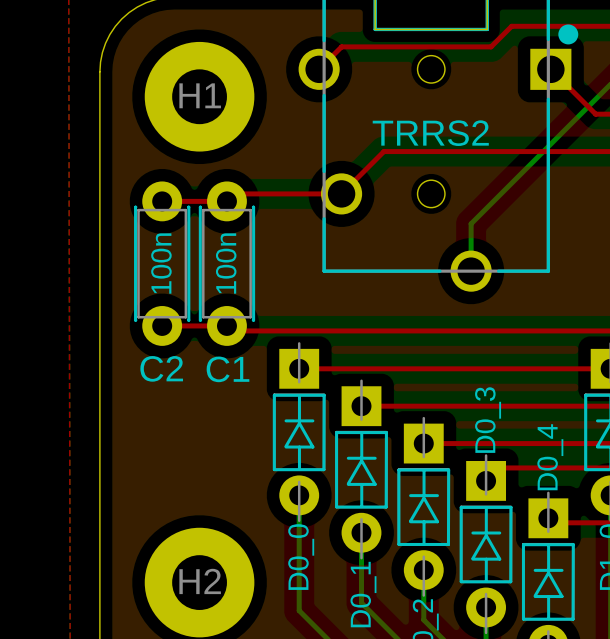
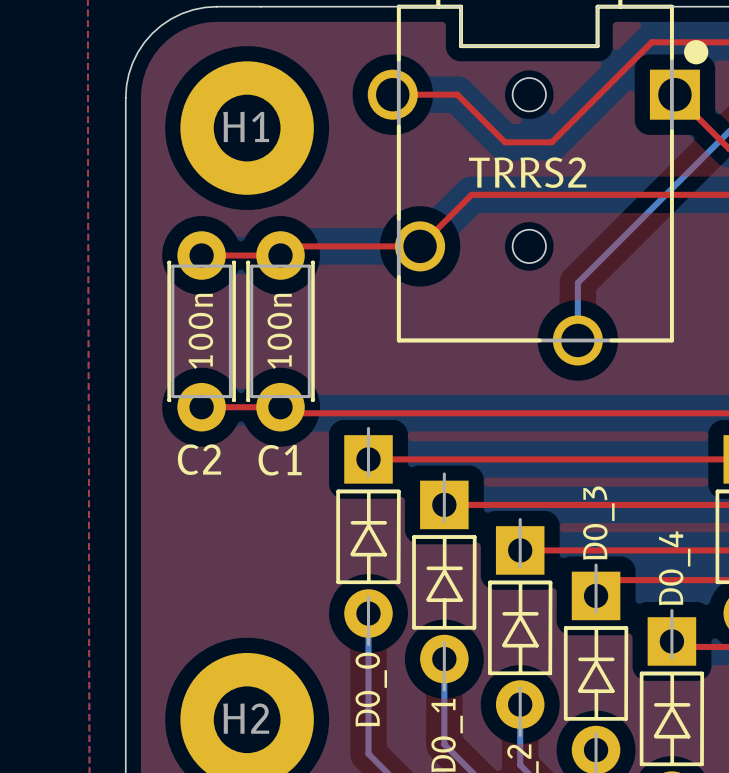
top track: (531, 26) (511, 26) (491, 46) (341, 46) (319, 69) -> (651, 42) (551, 142) (505, 142) (457, 94) (392, 94)

